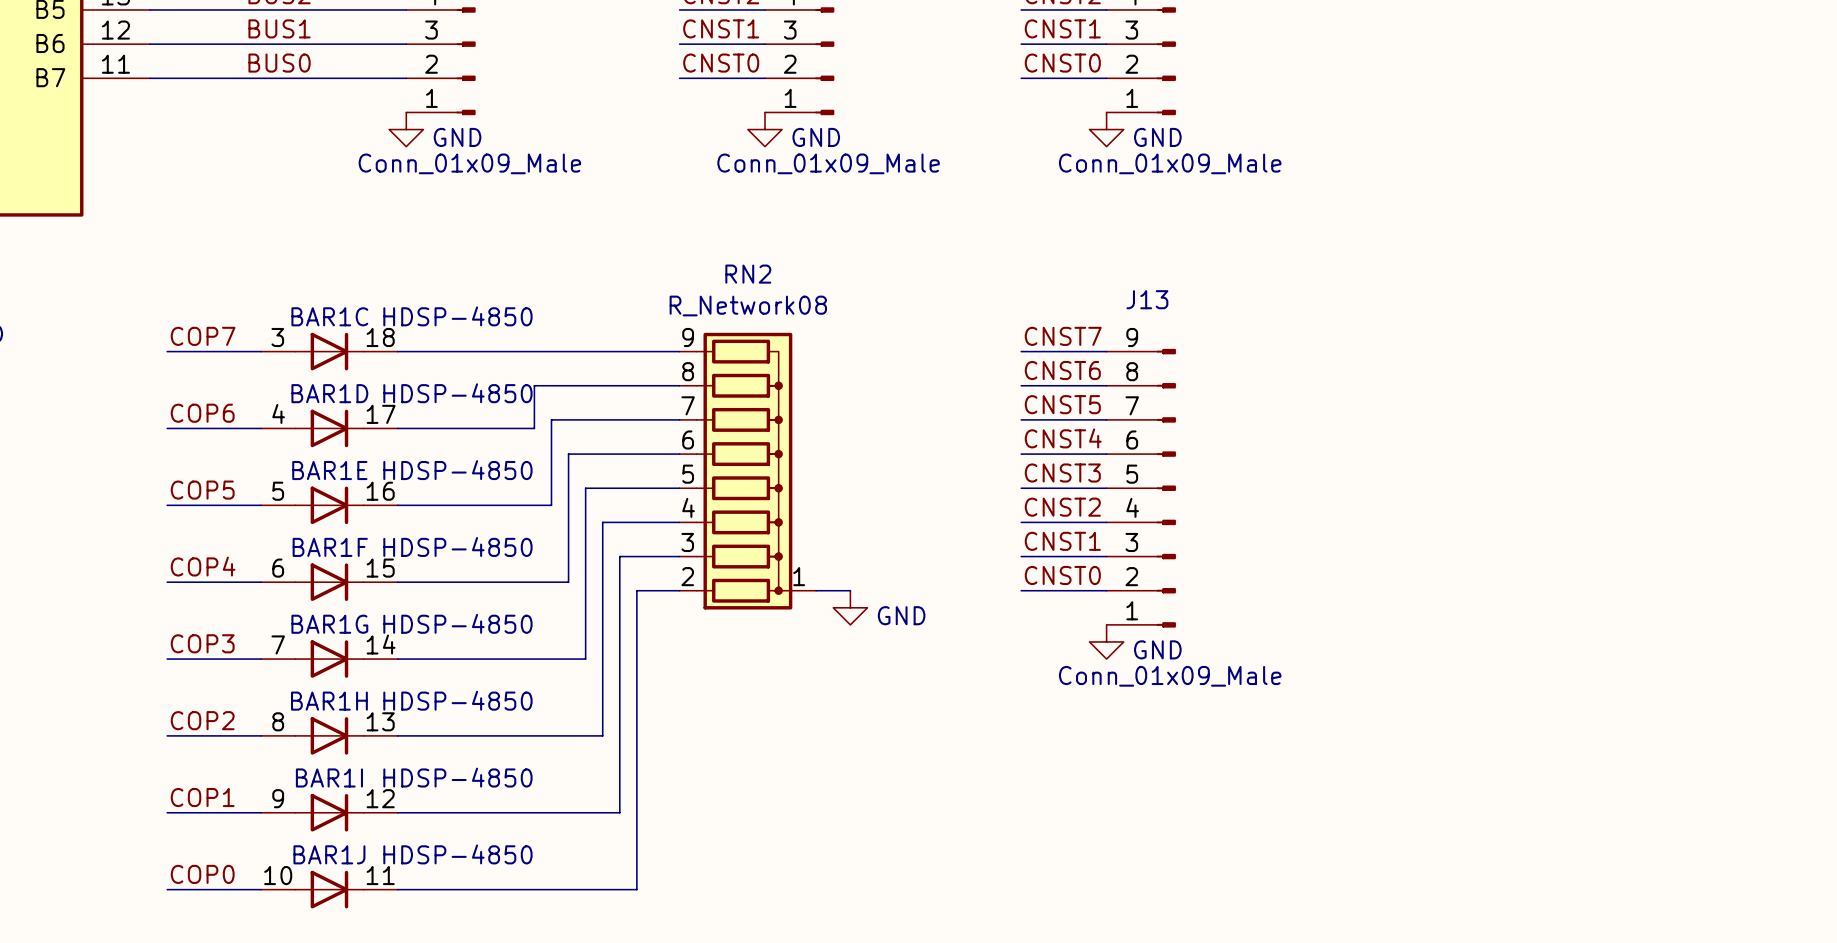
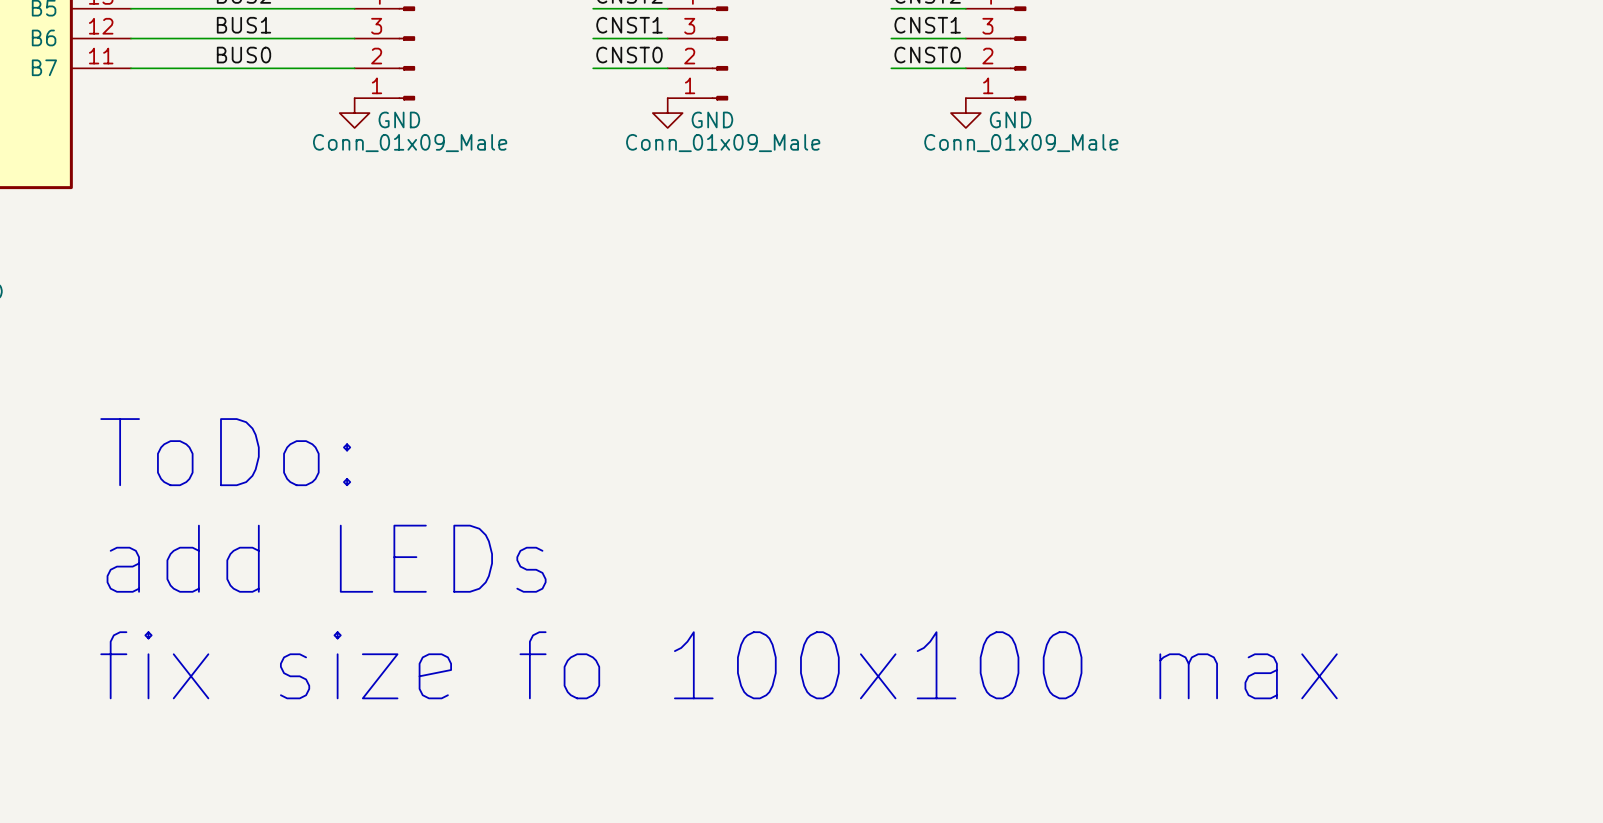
label: COP7 (203, 336) -> none
label: CNST7 (1063, 336) -> none
wire: (167, 351) (261, 351) -> none
BAR1C: HDSP-4850 (329, 351) -> none
wire: (397, 351) (679, 351) -> none
wire: (1021, 351) (1106, 351) -> none
label: CNST6 (1062, 370) -> none
wire: (679, 385) (534, 385) (534, 428) (397, 428) -> none
wire: (1021, 385) (1106, 385) -> none
label: CNST5 (1062, 404) -> none
label: COP6 (202, 413) -> none
wire: (679, 419) (551, 419) (551, 505) (397, 505) -> none
wire: (1021, 419) (1106, 419) -> none
wire: (167, 428) (261, 428) -> none
BAR1D: HDSP-4850 (329, 428) -> none
label: CNST4 (1063, 438) -> none
wire: (679, 454) (568, 454) (568, 582) (397, 582) -> none
wire: (1021, 454) (1106, 454) -> none
RN2: R_Network08 (747, 471) -> none
label: CNST3 (1062, 473) -> none
wire: (679, 488) (585, 488) (585, 659) (397, 659) -> none
wire: (1021, 488) (1106, 488) -> none
J13: Conn_01x09_Male (1141, 488) -> none
label: COP5 (202, 490) -> none
wire: (167, 505) (261, 505) -> none
BAR1E: HDSP-4850 (329, 505) -> none
label: CNST2 (1062, 507) -> none
text: none -> ToDo: (225, 452)
wire: (679, 522) (602, 522) (602, 735) (397, 735) -> none
wire: (1021, 522) (1106, 522) -> none
label: CNST1 (1062, 541) -> none
wire: (679, 556) (619, 556) (619, 812) (397, 812) -> none
wire: (1021, 556) (1106, 556) -> none
label: COP4 (203, 566) -> none
label: CNST0 (1062, 575) -> none
wire: (167, 582) (261, 582) -> none
BAR1F: HDSP-4850 (329, 582) -> none
wire: (679, 590) (636, 590) (636, 889) (397, 889) -> none
wire: (816, 590) (850, 590) -> none
wire: (1021, 590) (1106, 590) -> none
power symbol: GND (850, 607) -> none
text: none -> add LEDs (326, 558)
power symbol: GND (1106, 641) -> none
label: COP3 (202, 643) -> none
wire: (167, 659) (261, 659) -> none
BAR1G: HDSP-4850 (329, 659) -> none
label: COP2 (202, 720) -> none
wire: (167, 735) (261, 735) -> none
BAR1H: HDSP-4850 (329, 735) -> none
text: none -> fix size fo 100x100 max (719, 665)
label: COP1 (202, 797) -> none
wire: (167, 812) (261, 812) -> none
BAR1I: HDSP-4850 (329, 812) -> none
label: COP0 (202, 874) -> none
wire: (167, 889) (261, 889) -> none
BAR1J: HDSP-4850 (329, 889) -> none

